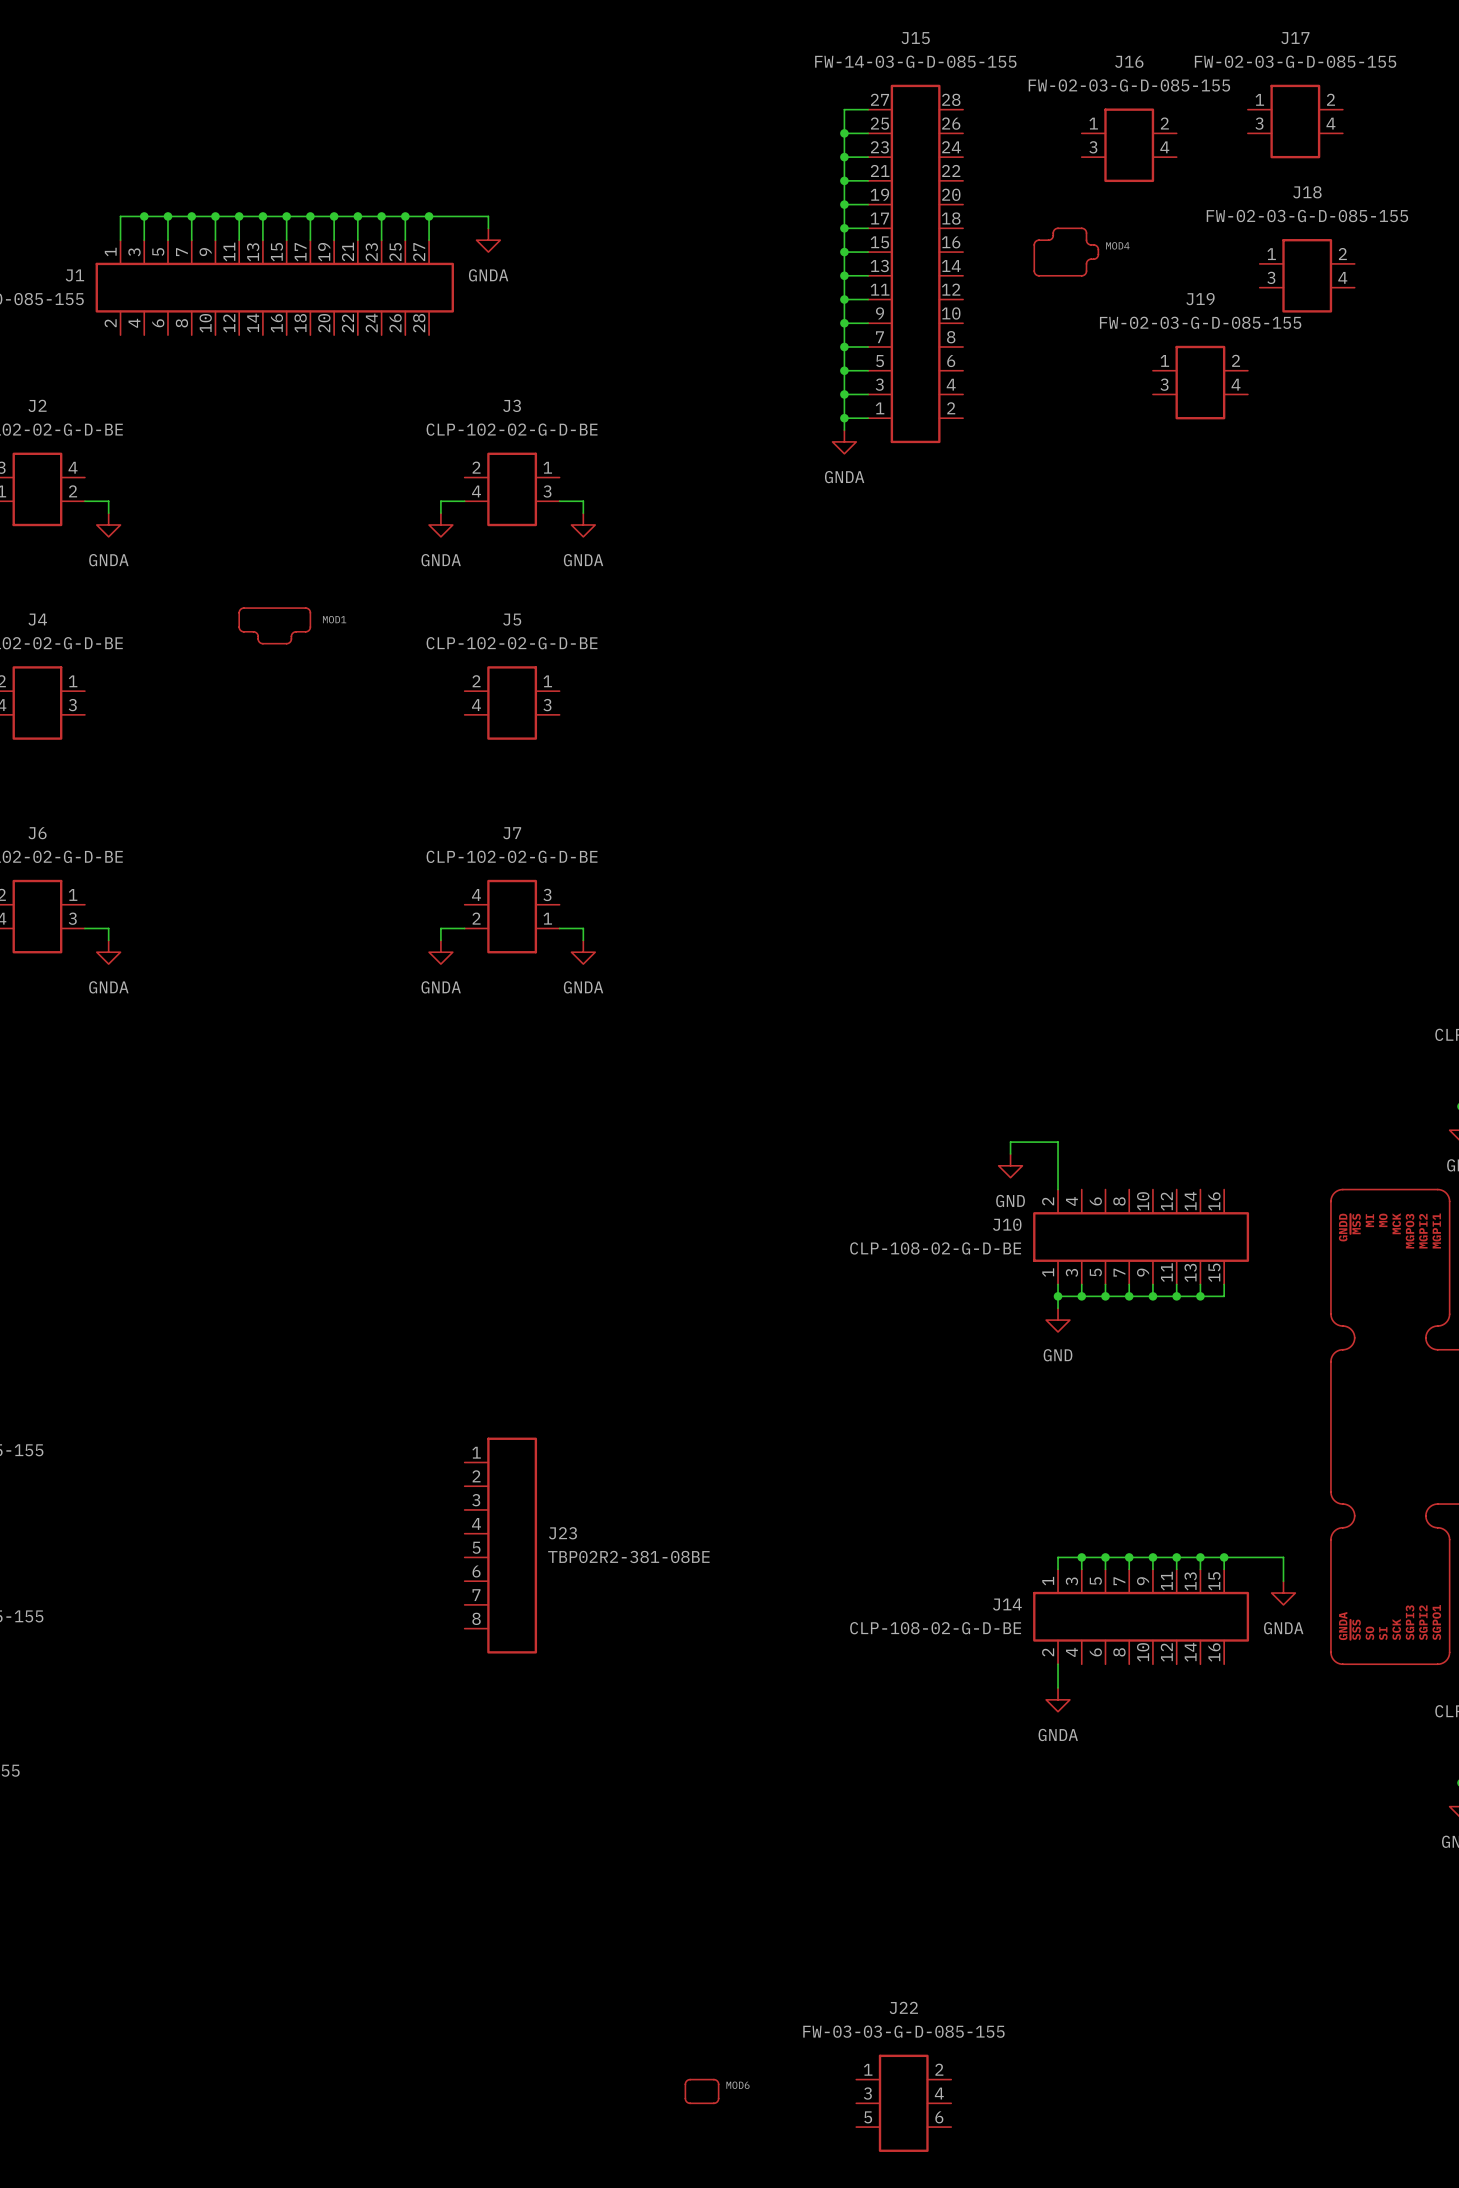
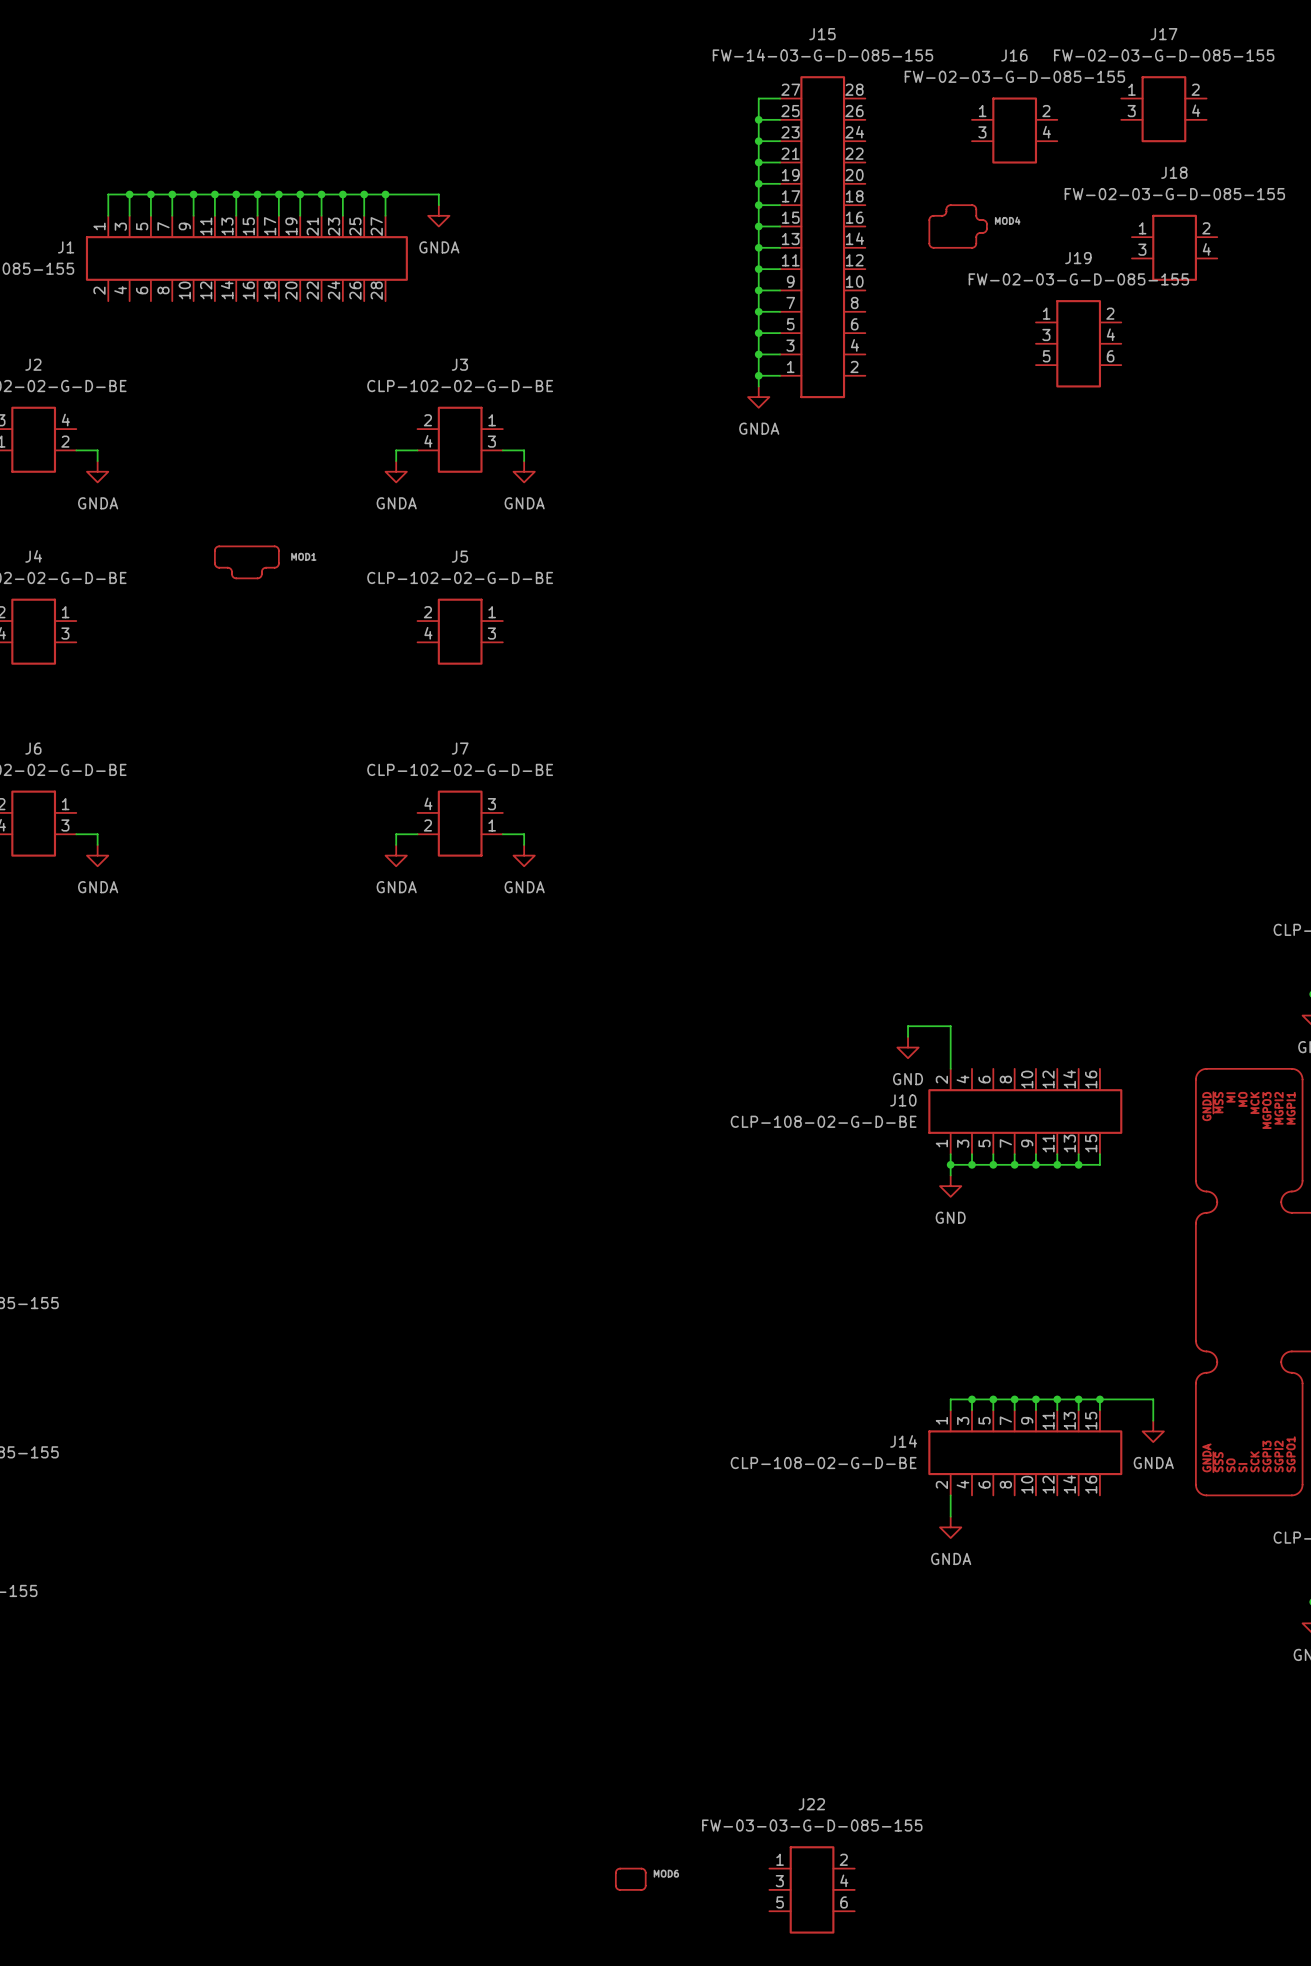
J19 symbol: [1152, 345, 1248, 420] -> [1035, 300, 1122, 388]
J23: TBP02R2-381-08BE (500, 1545) -> none

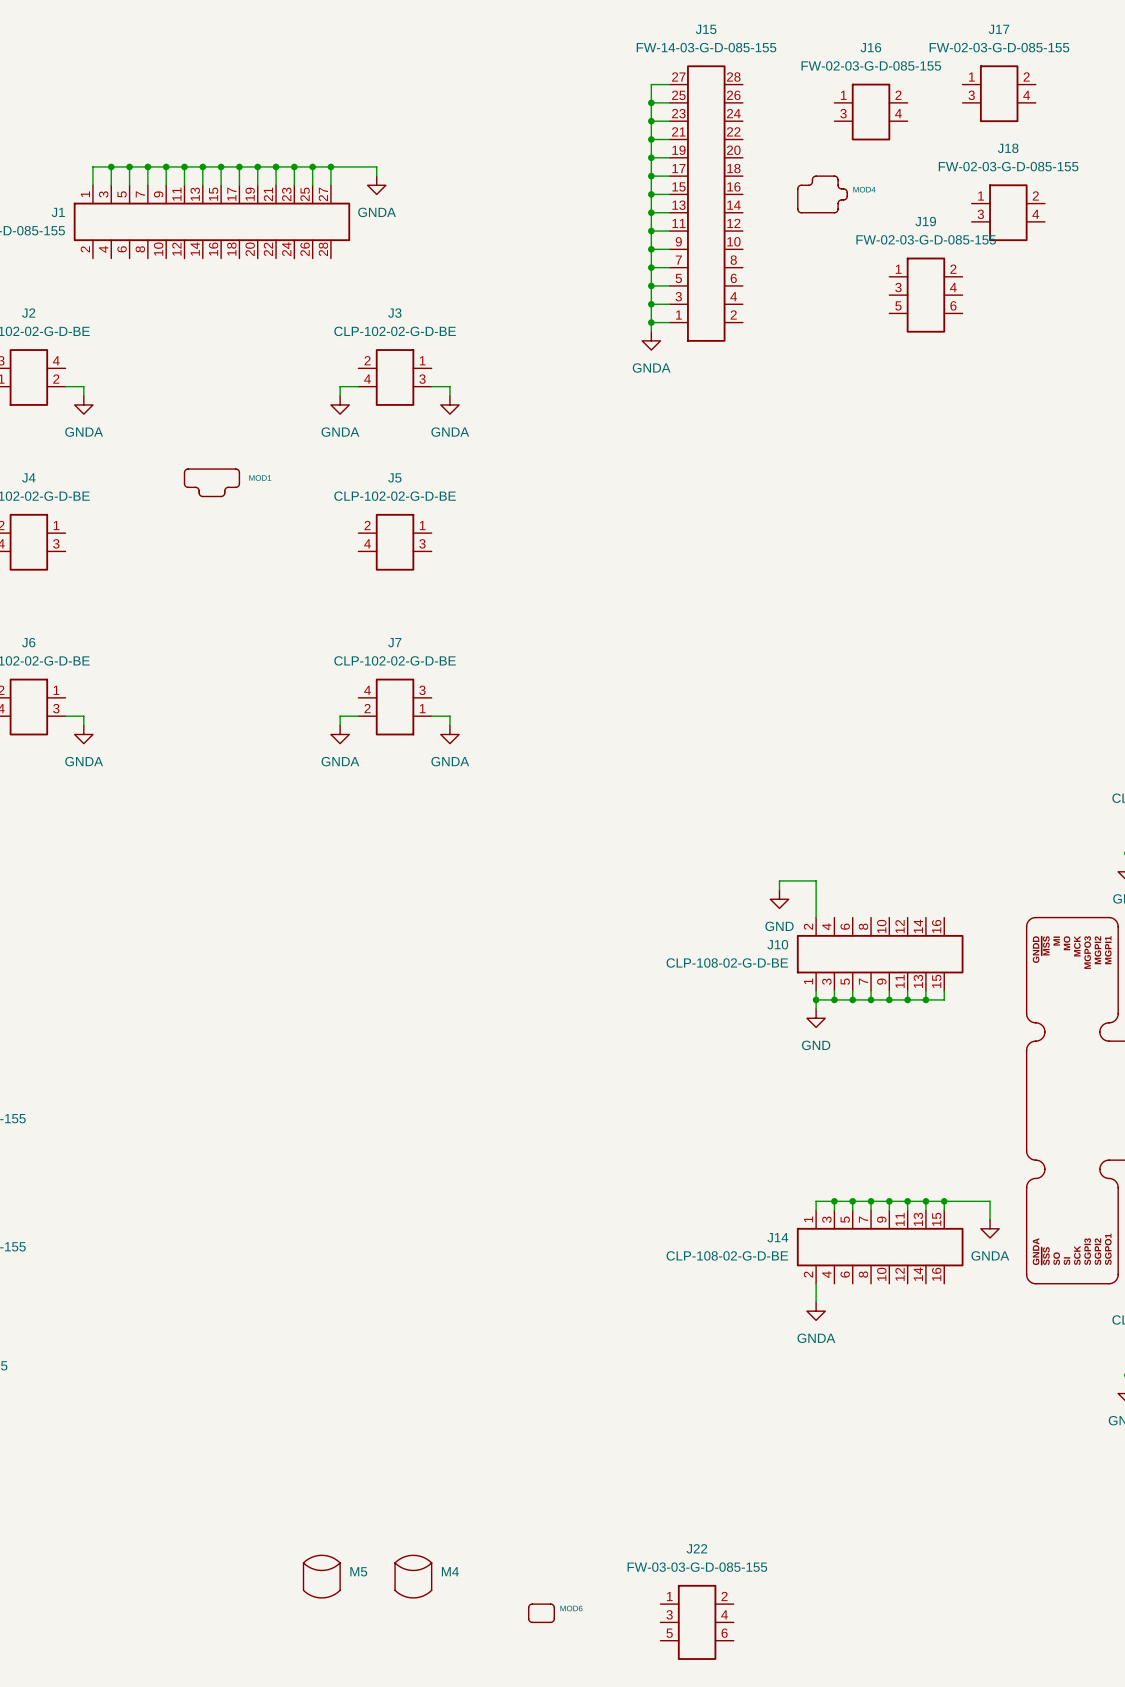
M5: none -> (321, 1576)
M4: none -> (413, 1576)

